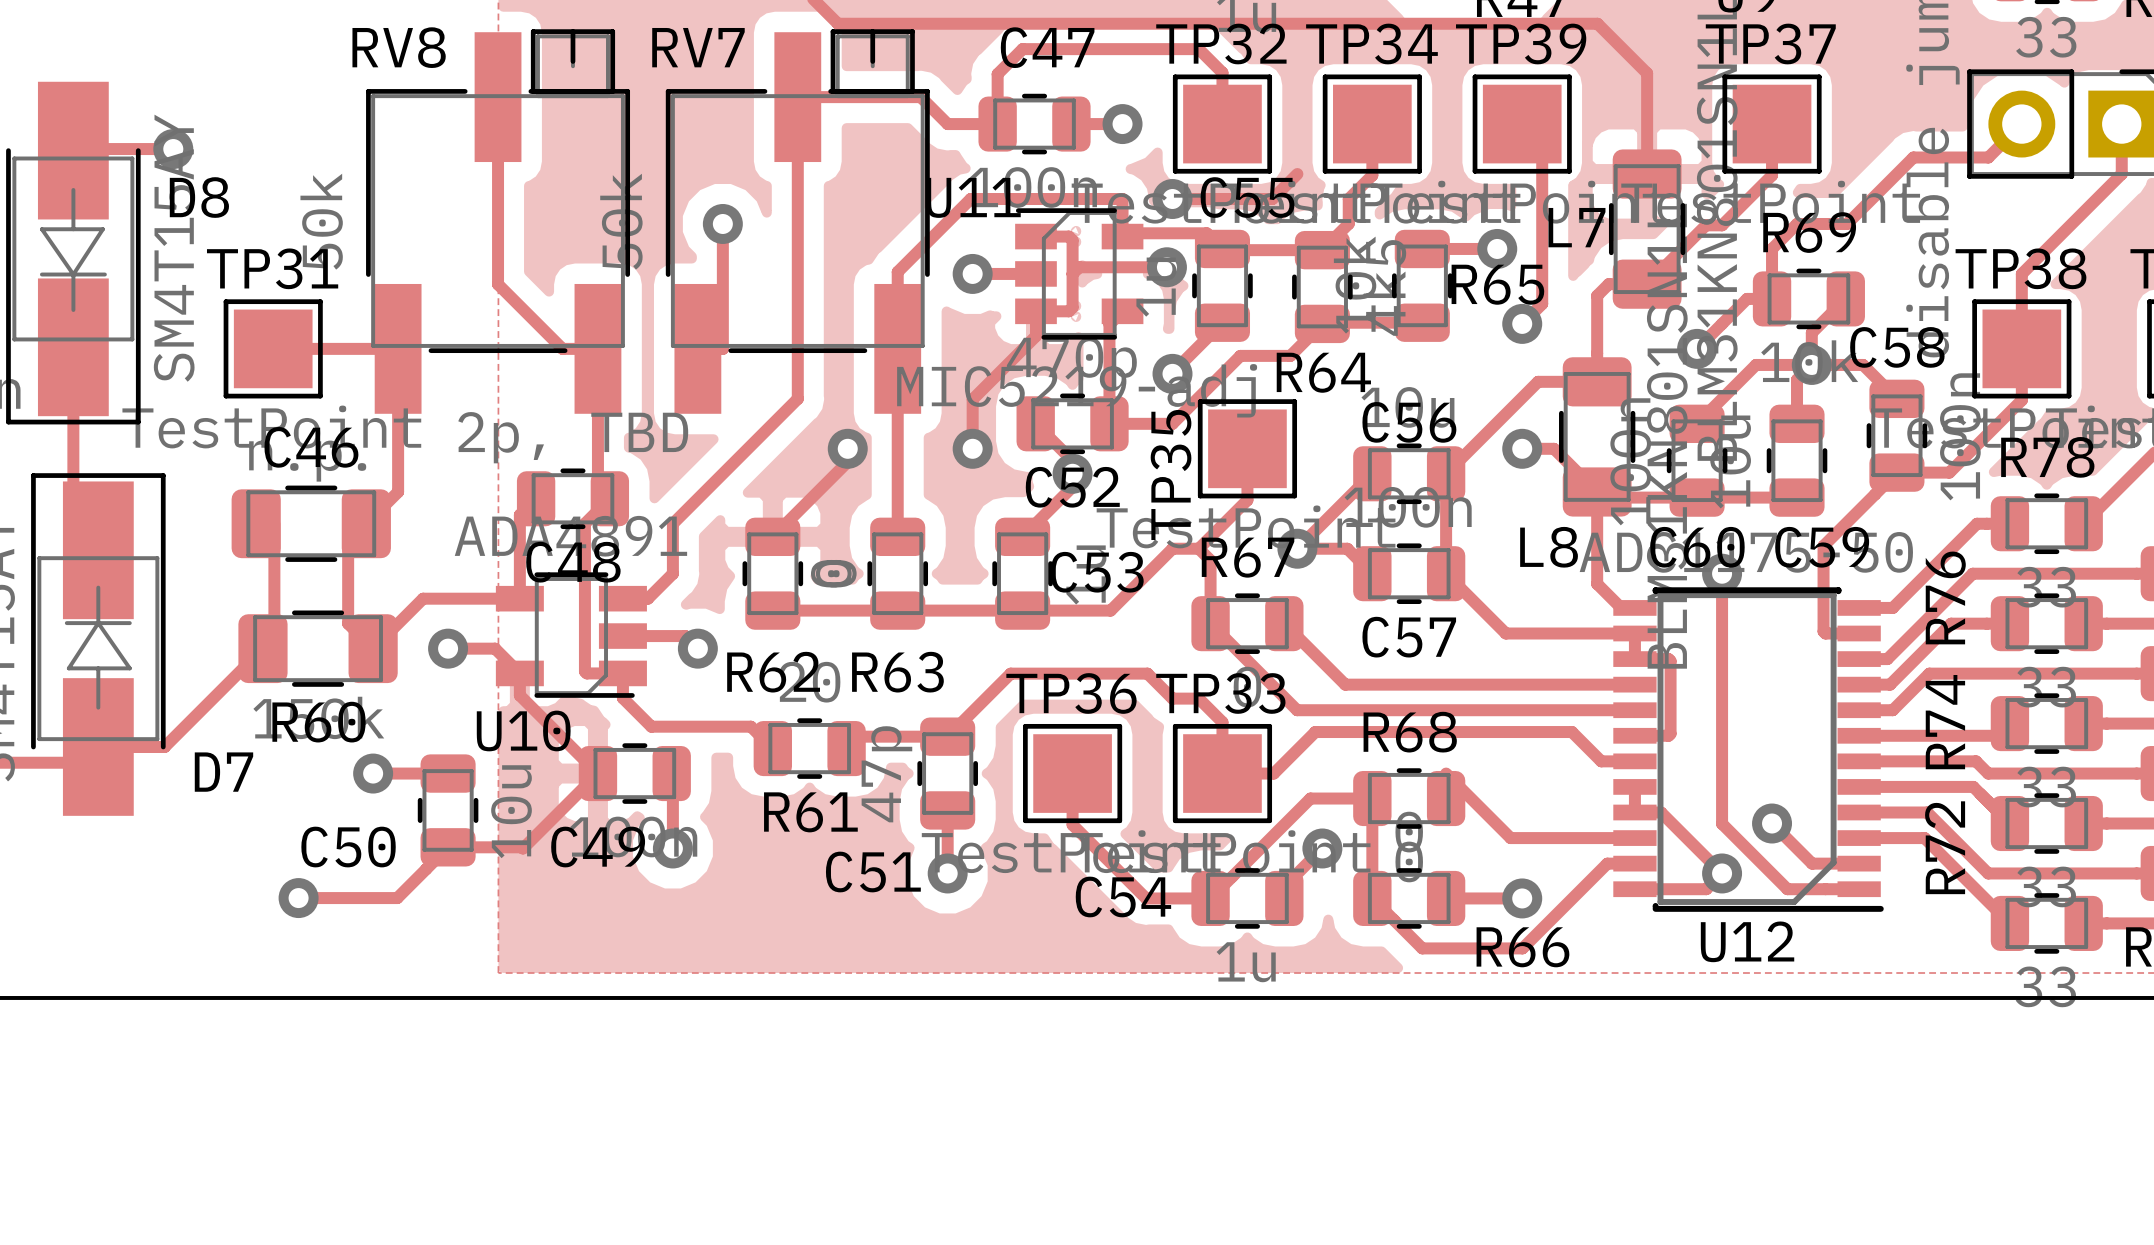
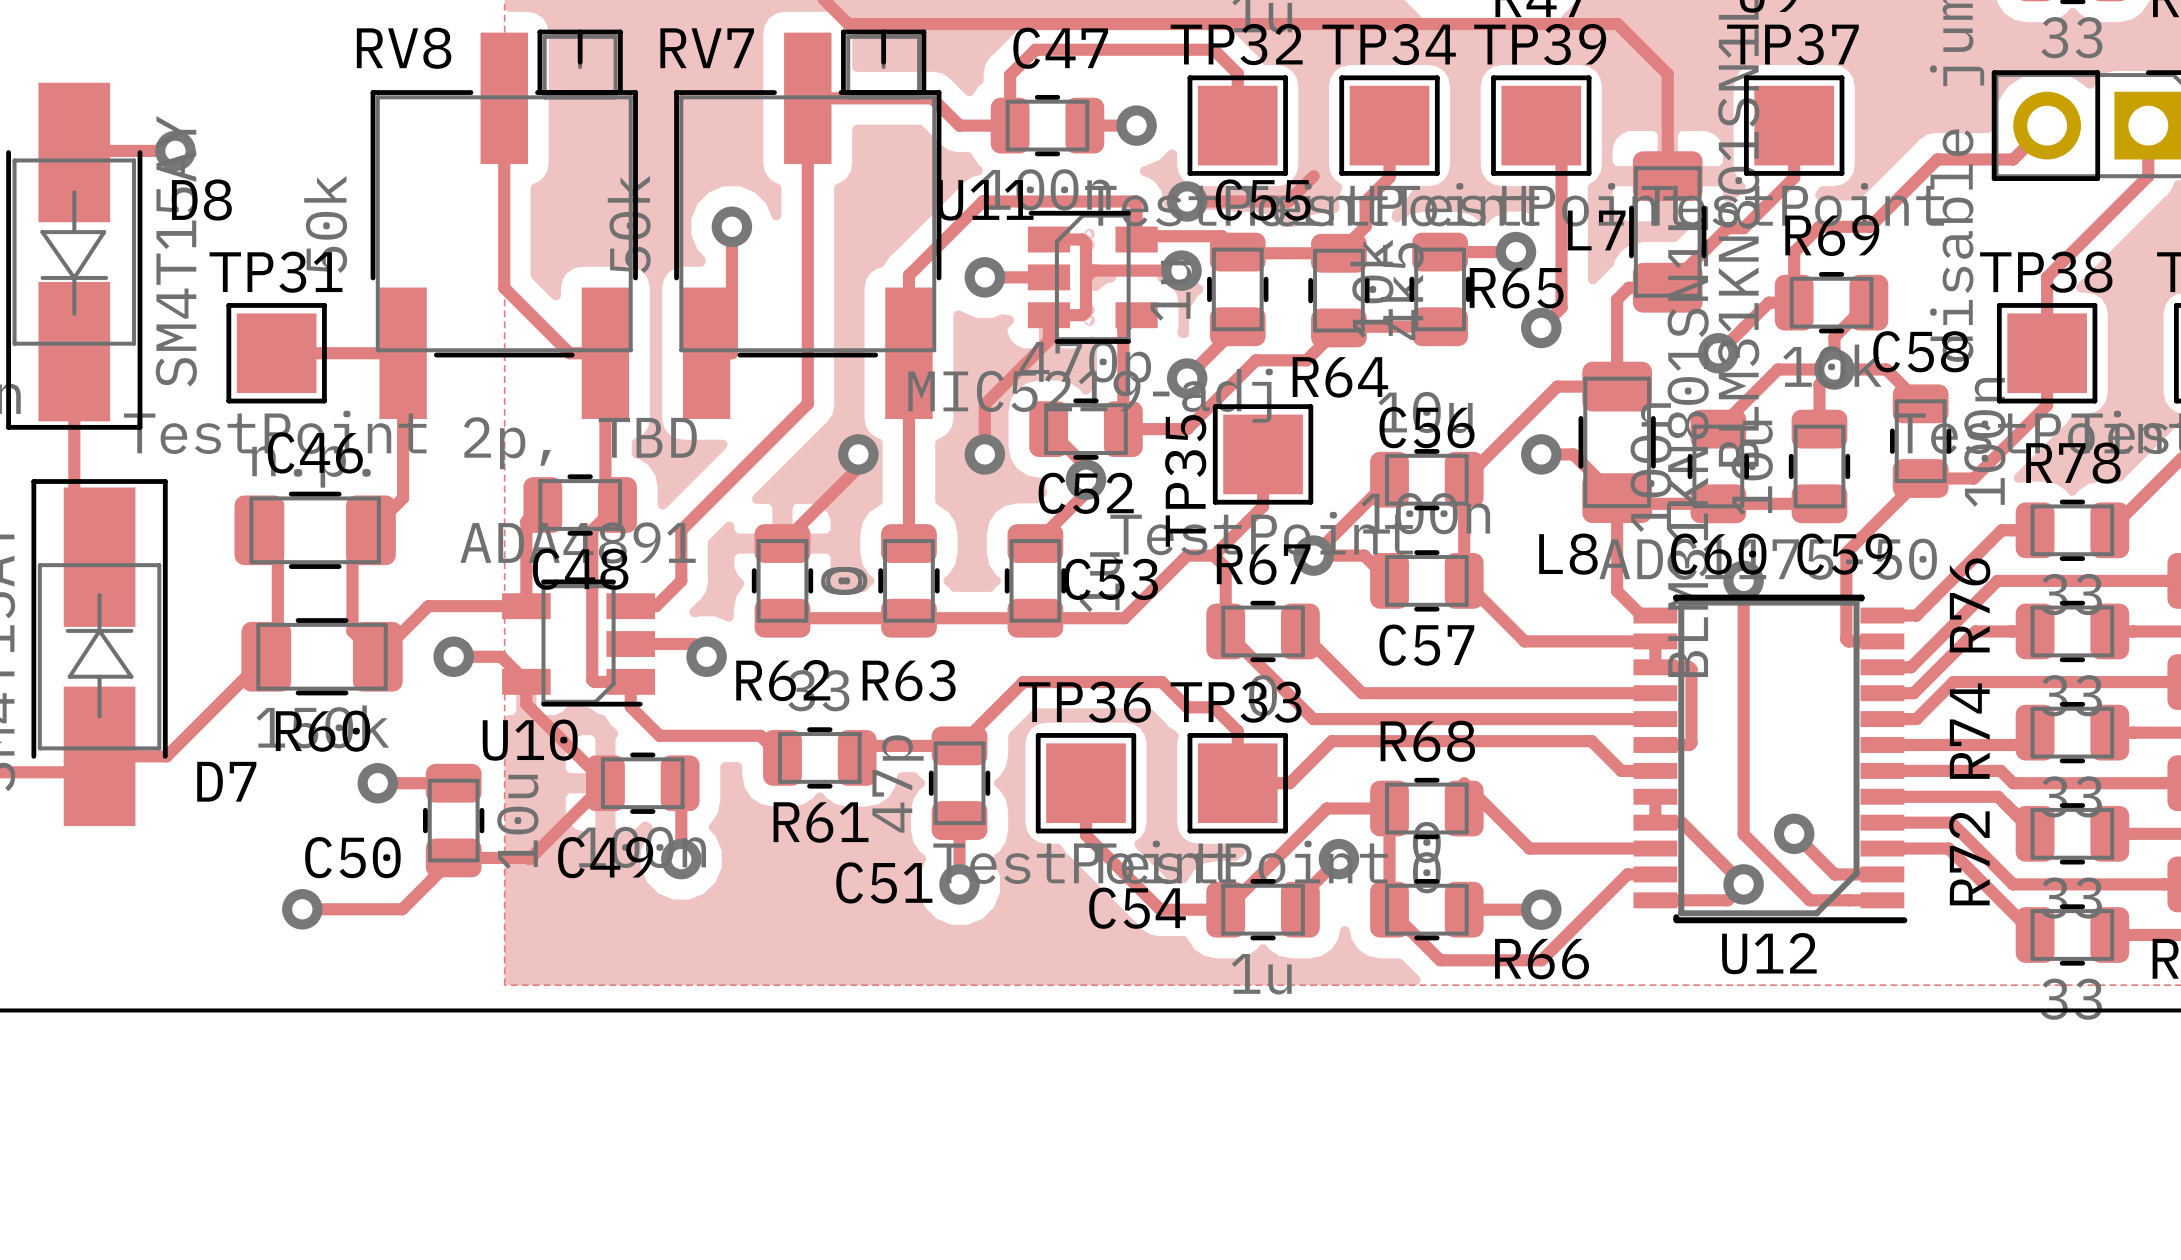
R61 value: 20 (809, 682) -> 33 (818, 690)

